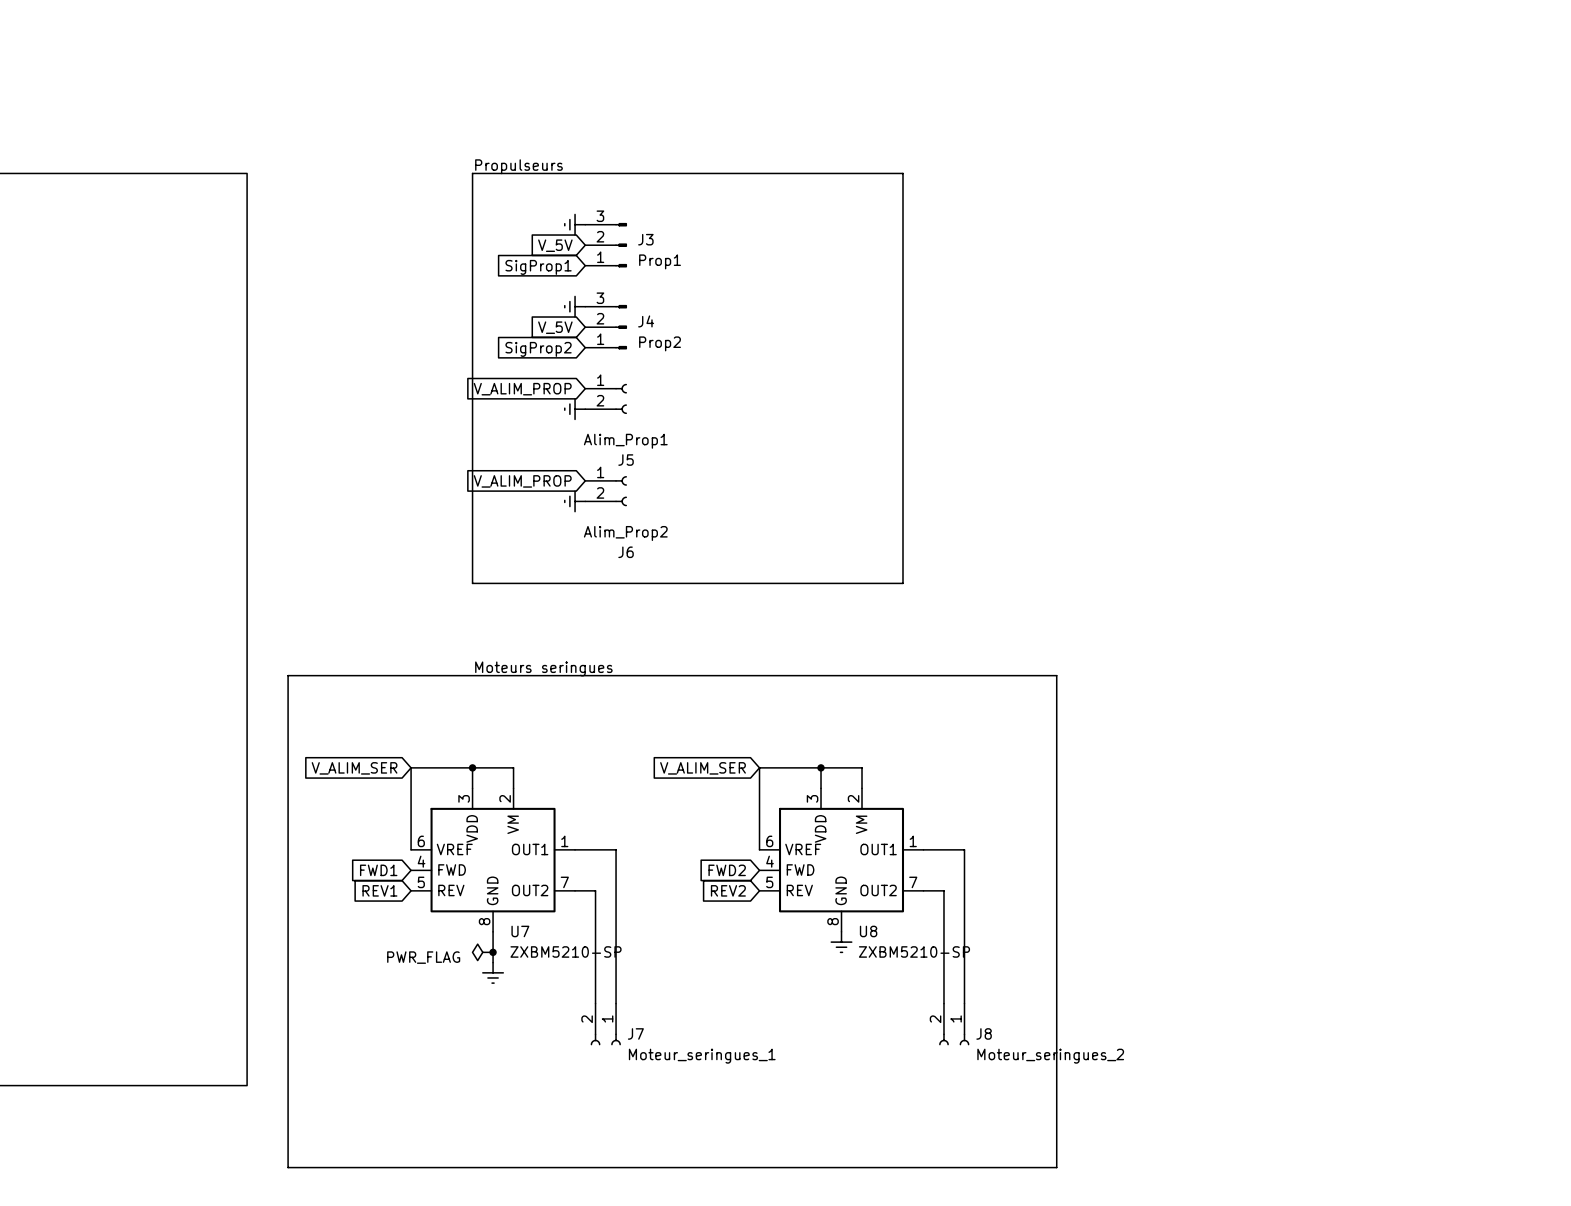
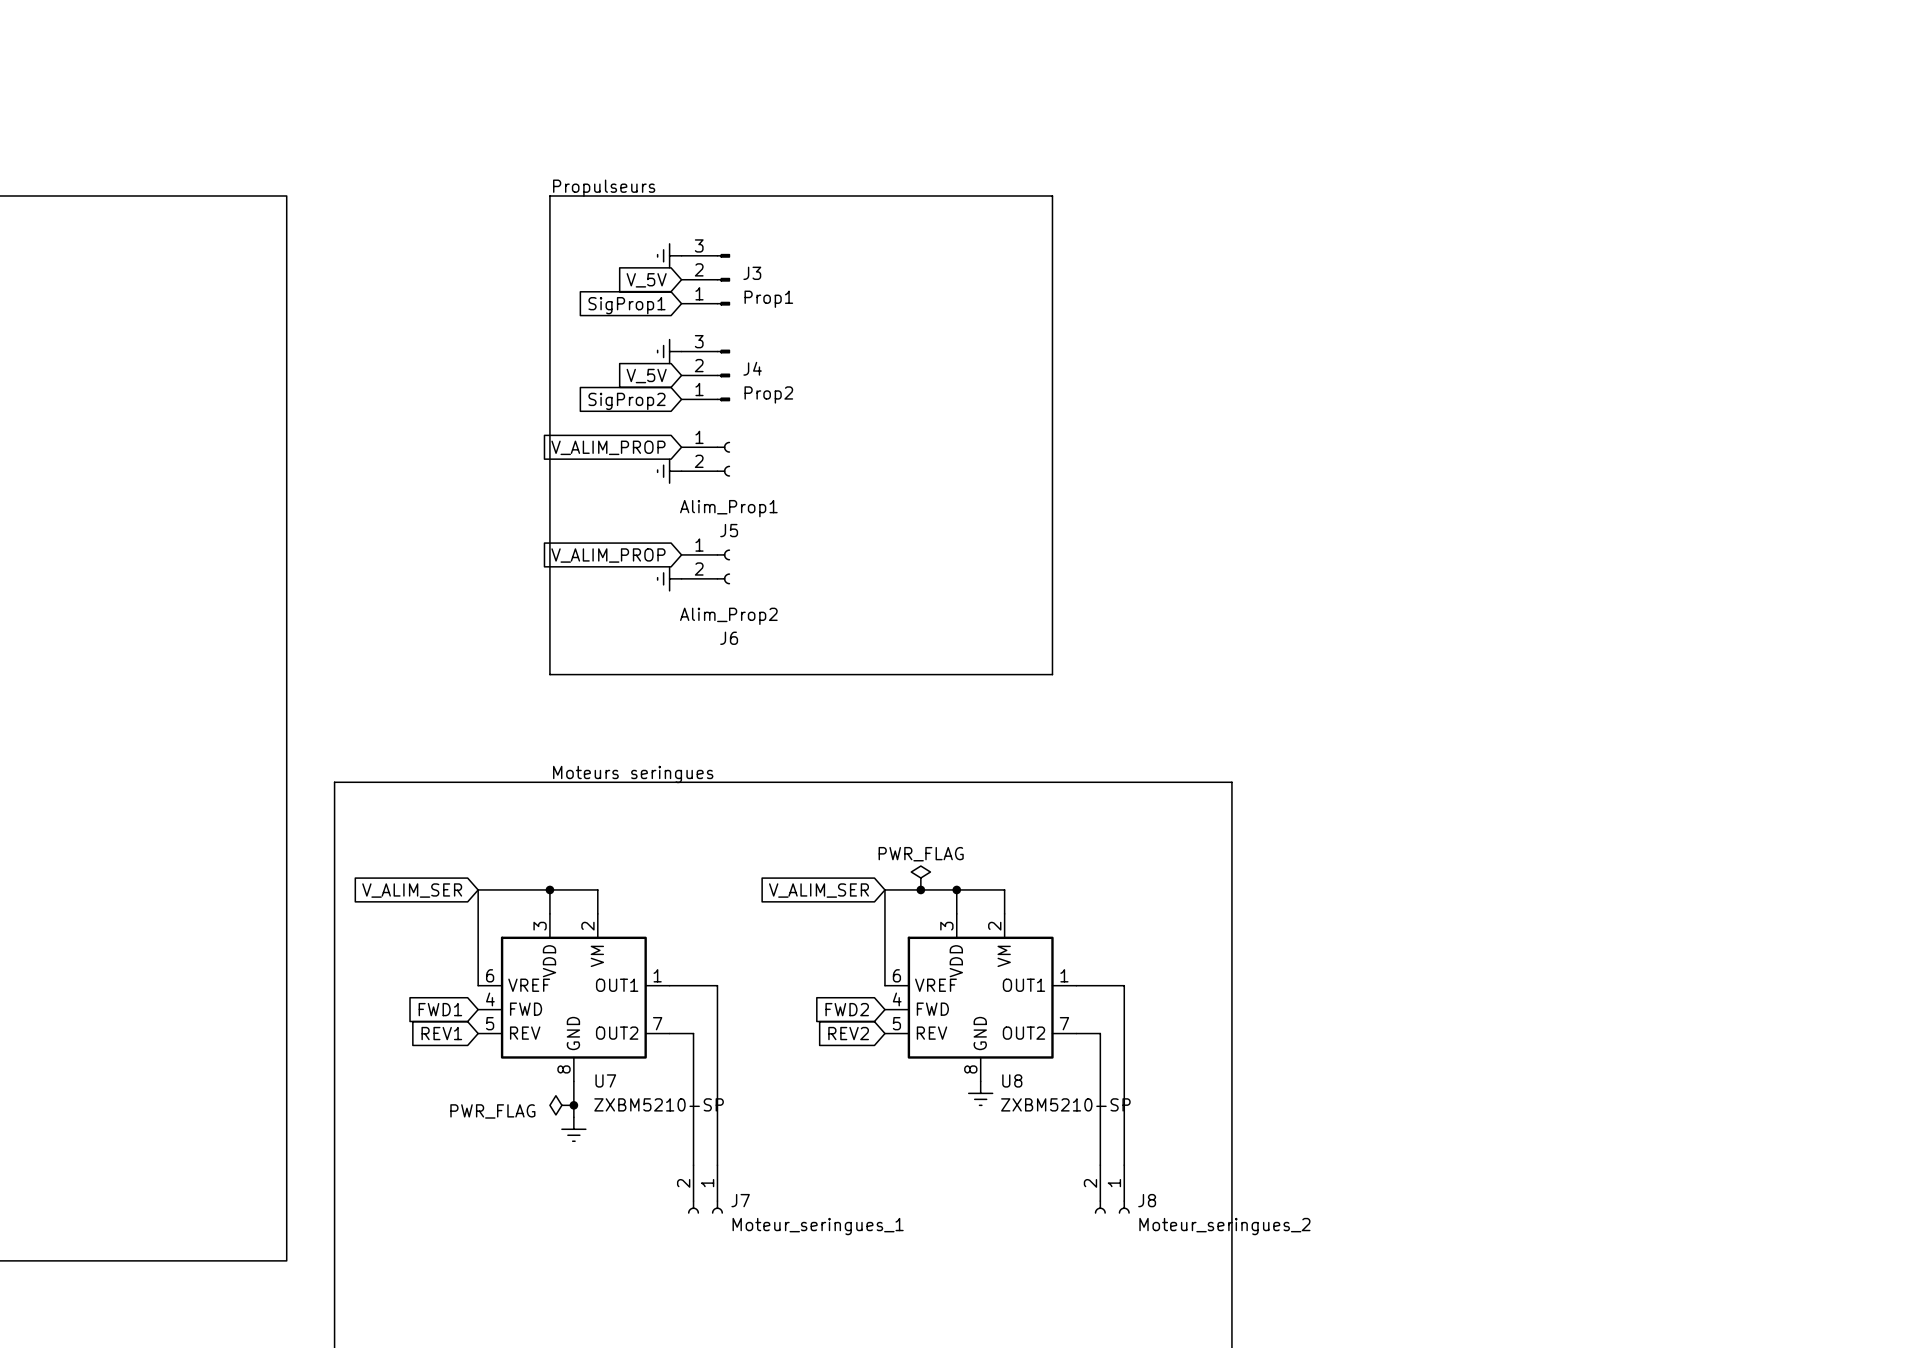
power symbol: none -> PWR_FLAG (920, 878)
junction: none -> (920, 889)

